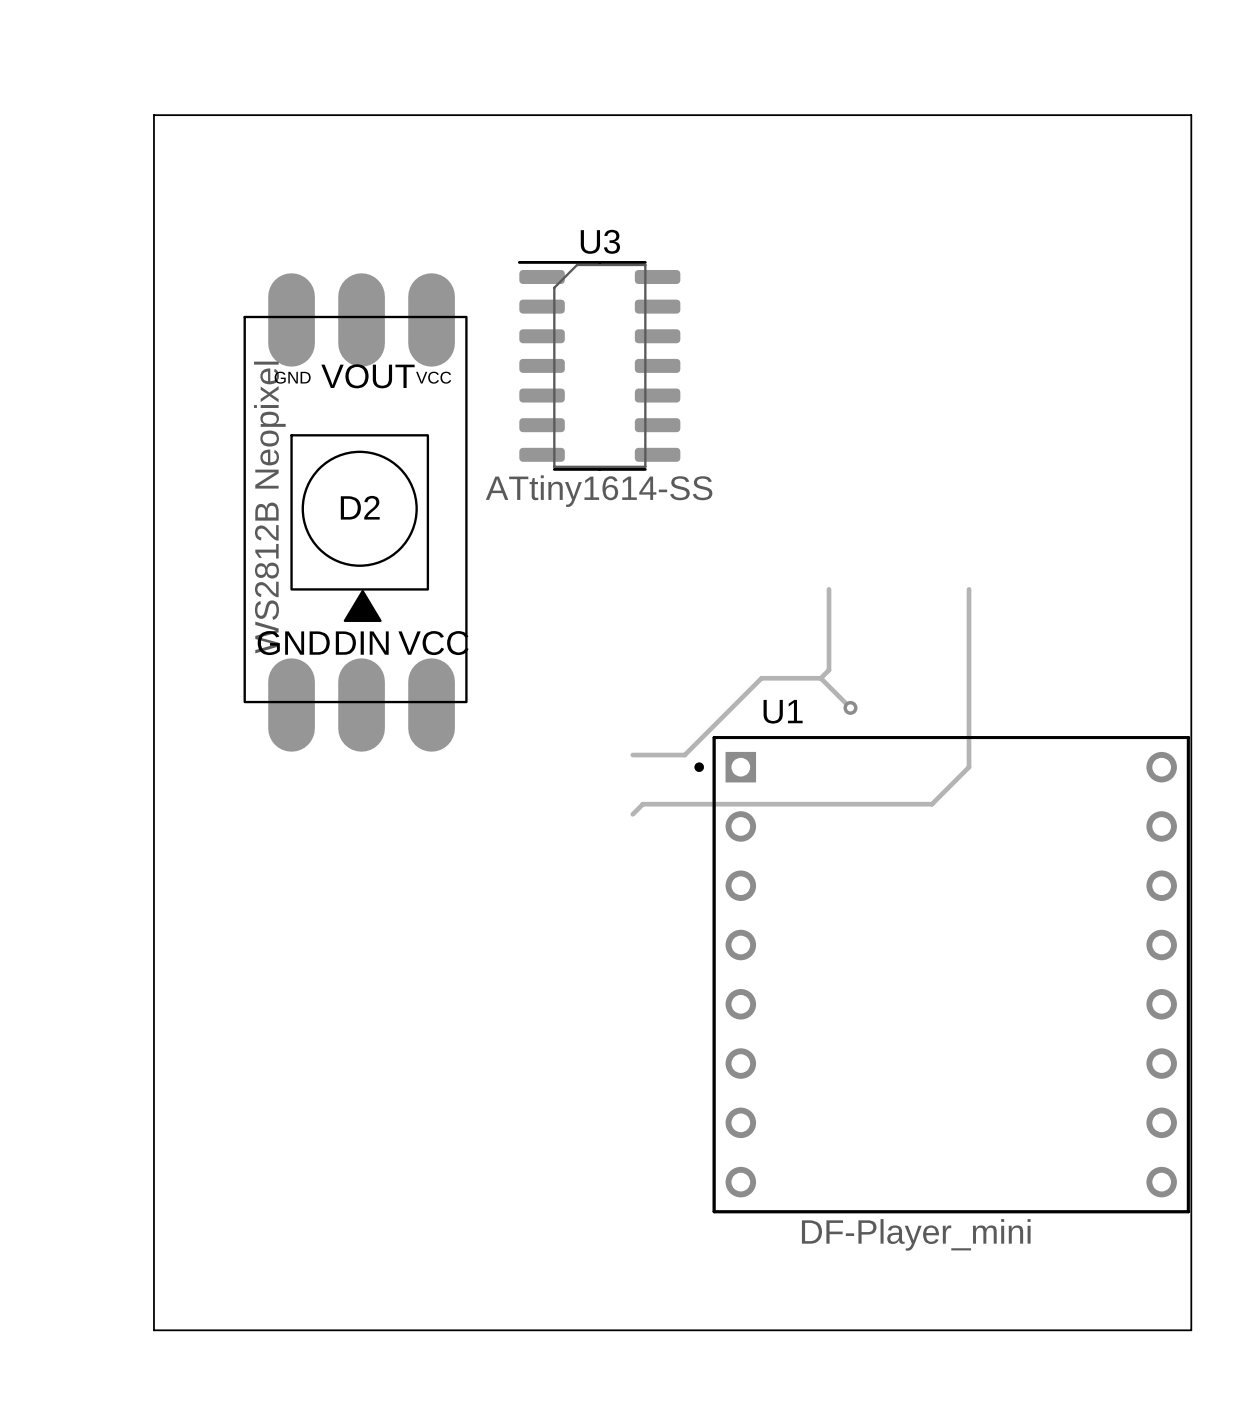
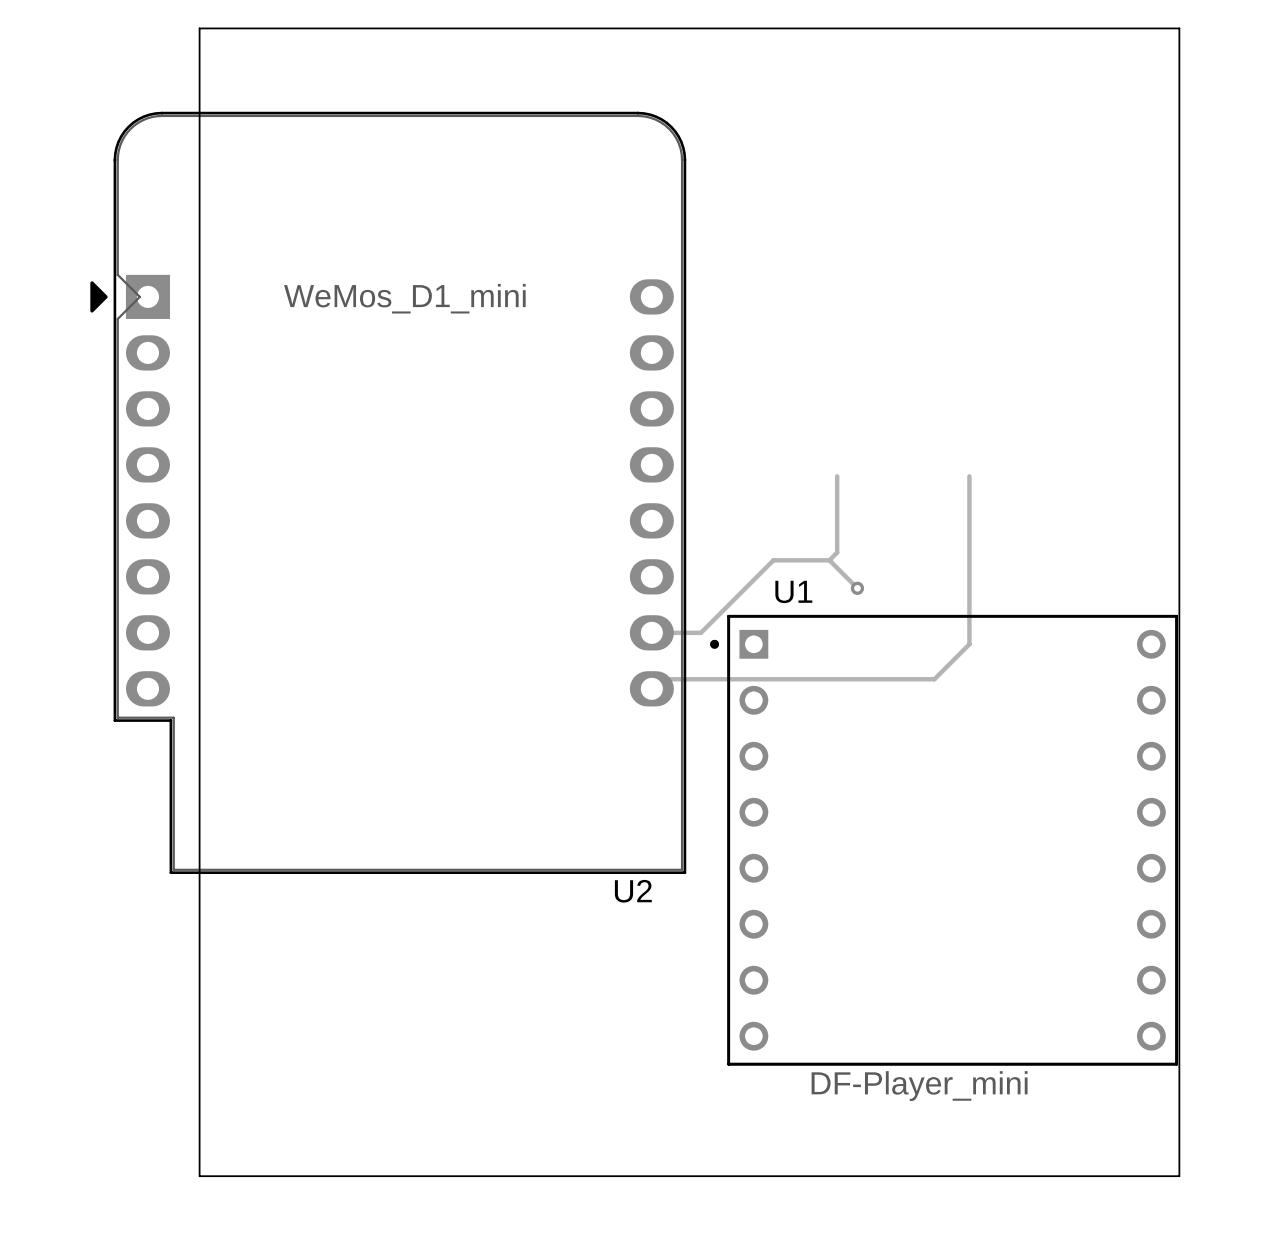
U3: ATtiny1614-SS (599, 365) -> none
D2: WS2812B Neopixel (355, 512) -> none
U2: none -> WeMos_D1_mini (388, 492)

